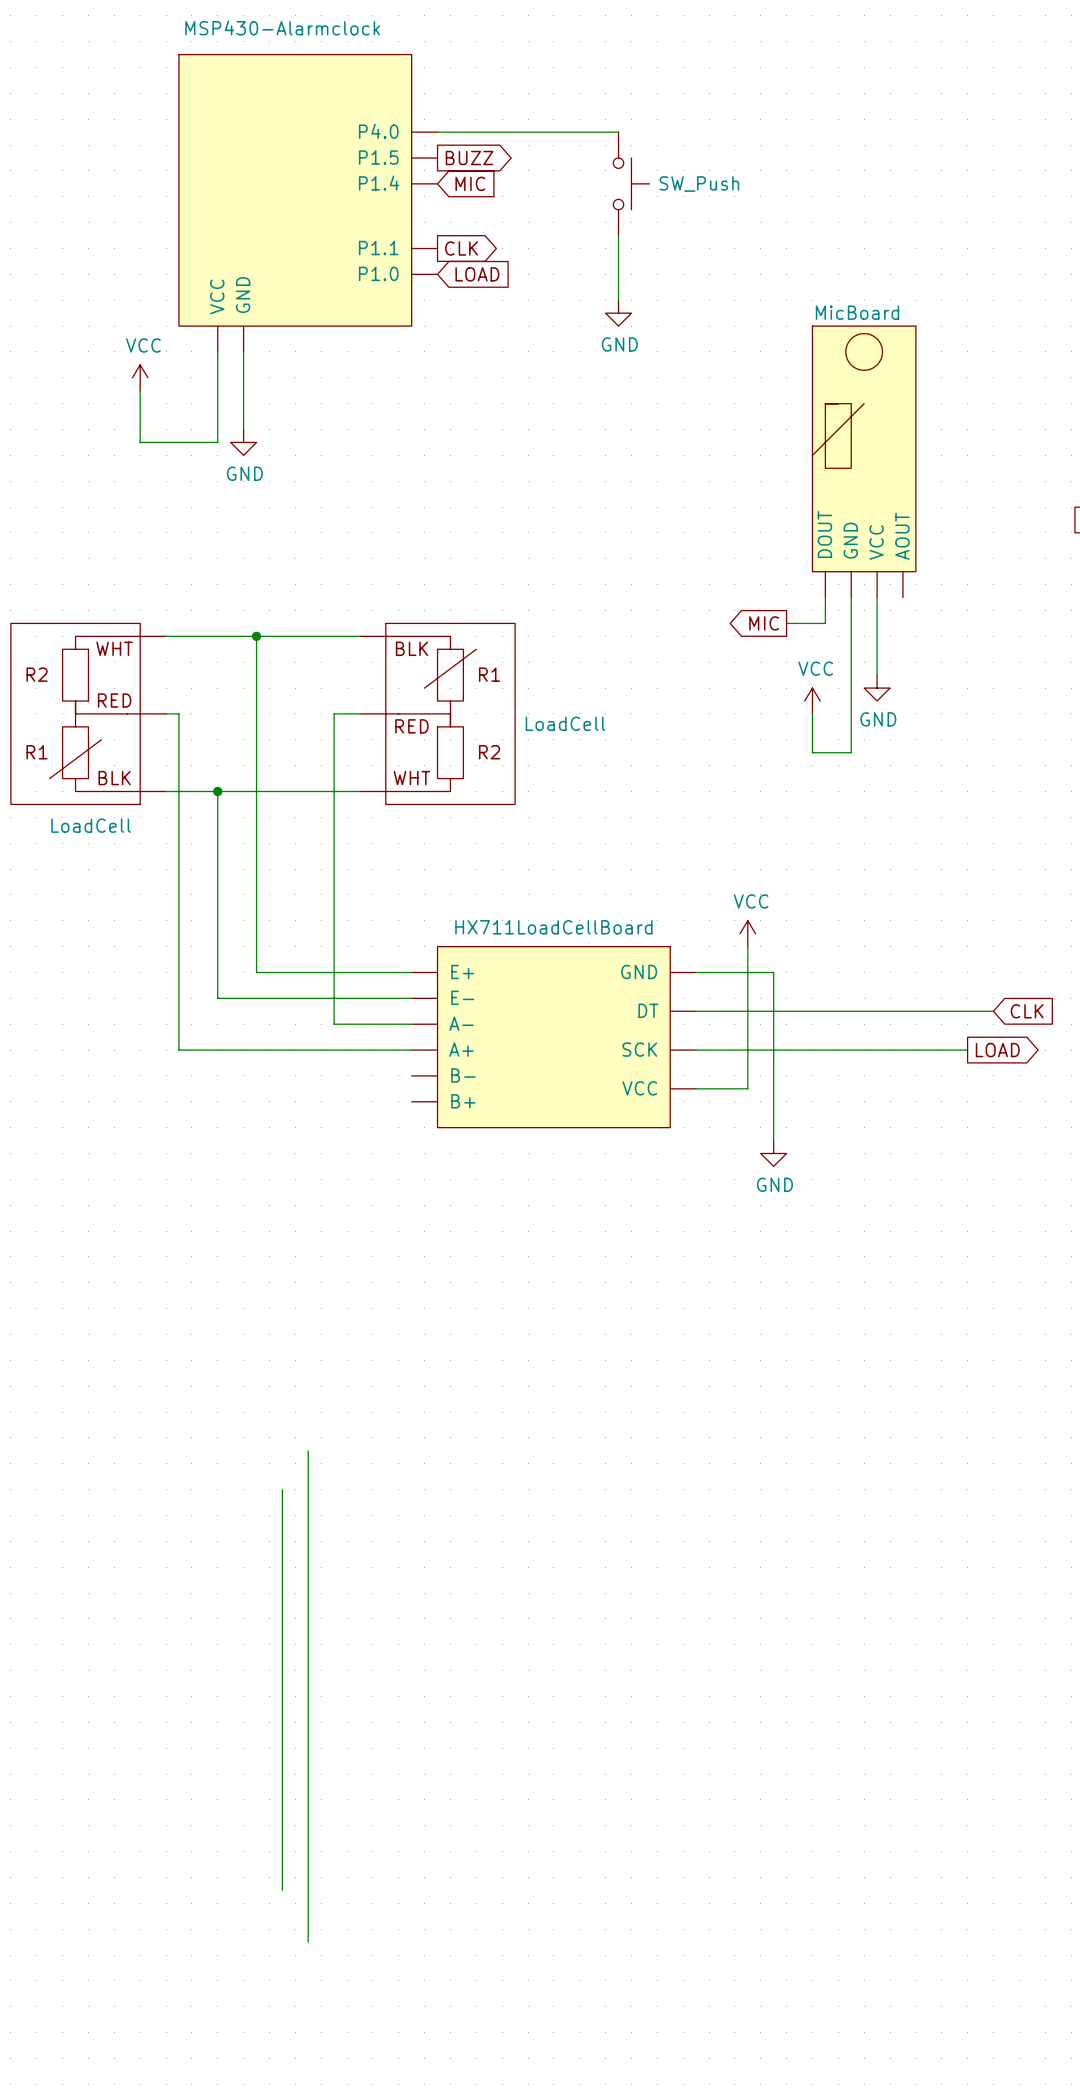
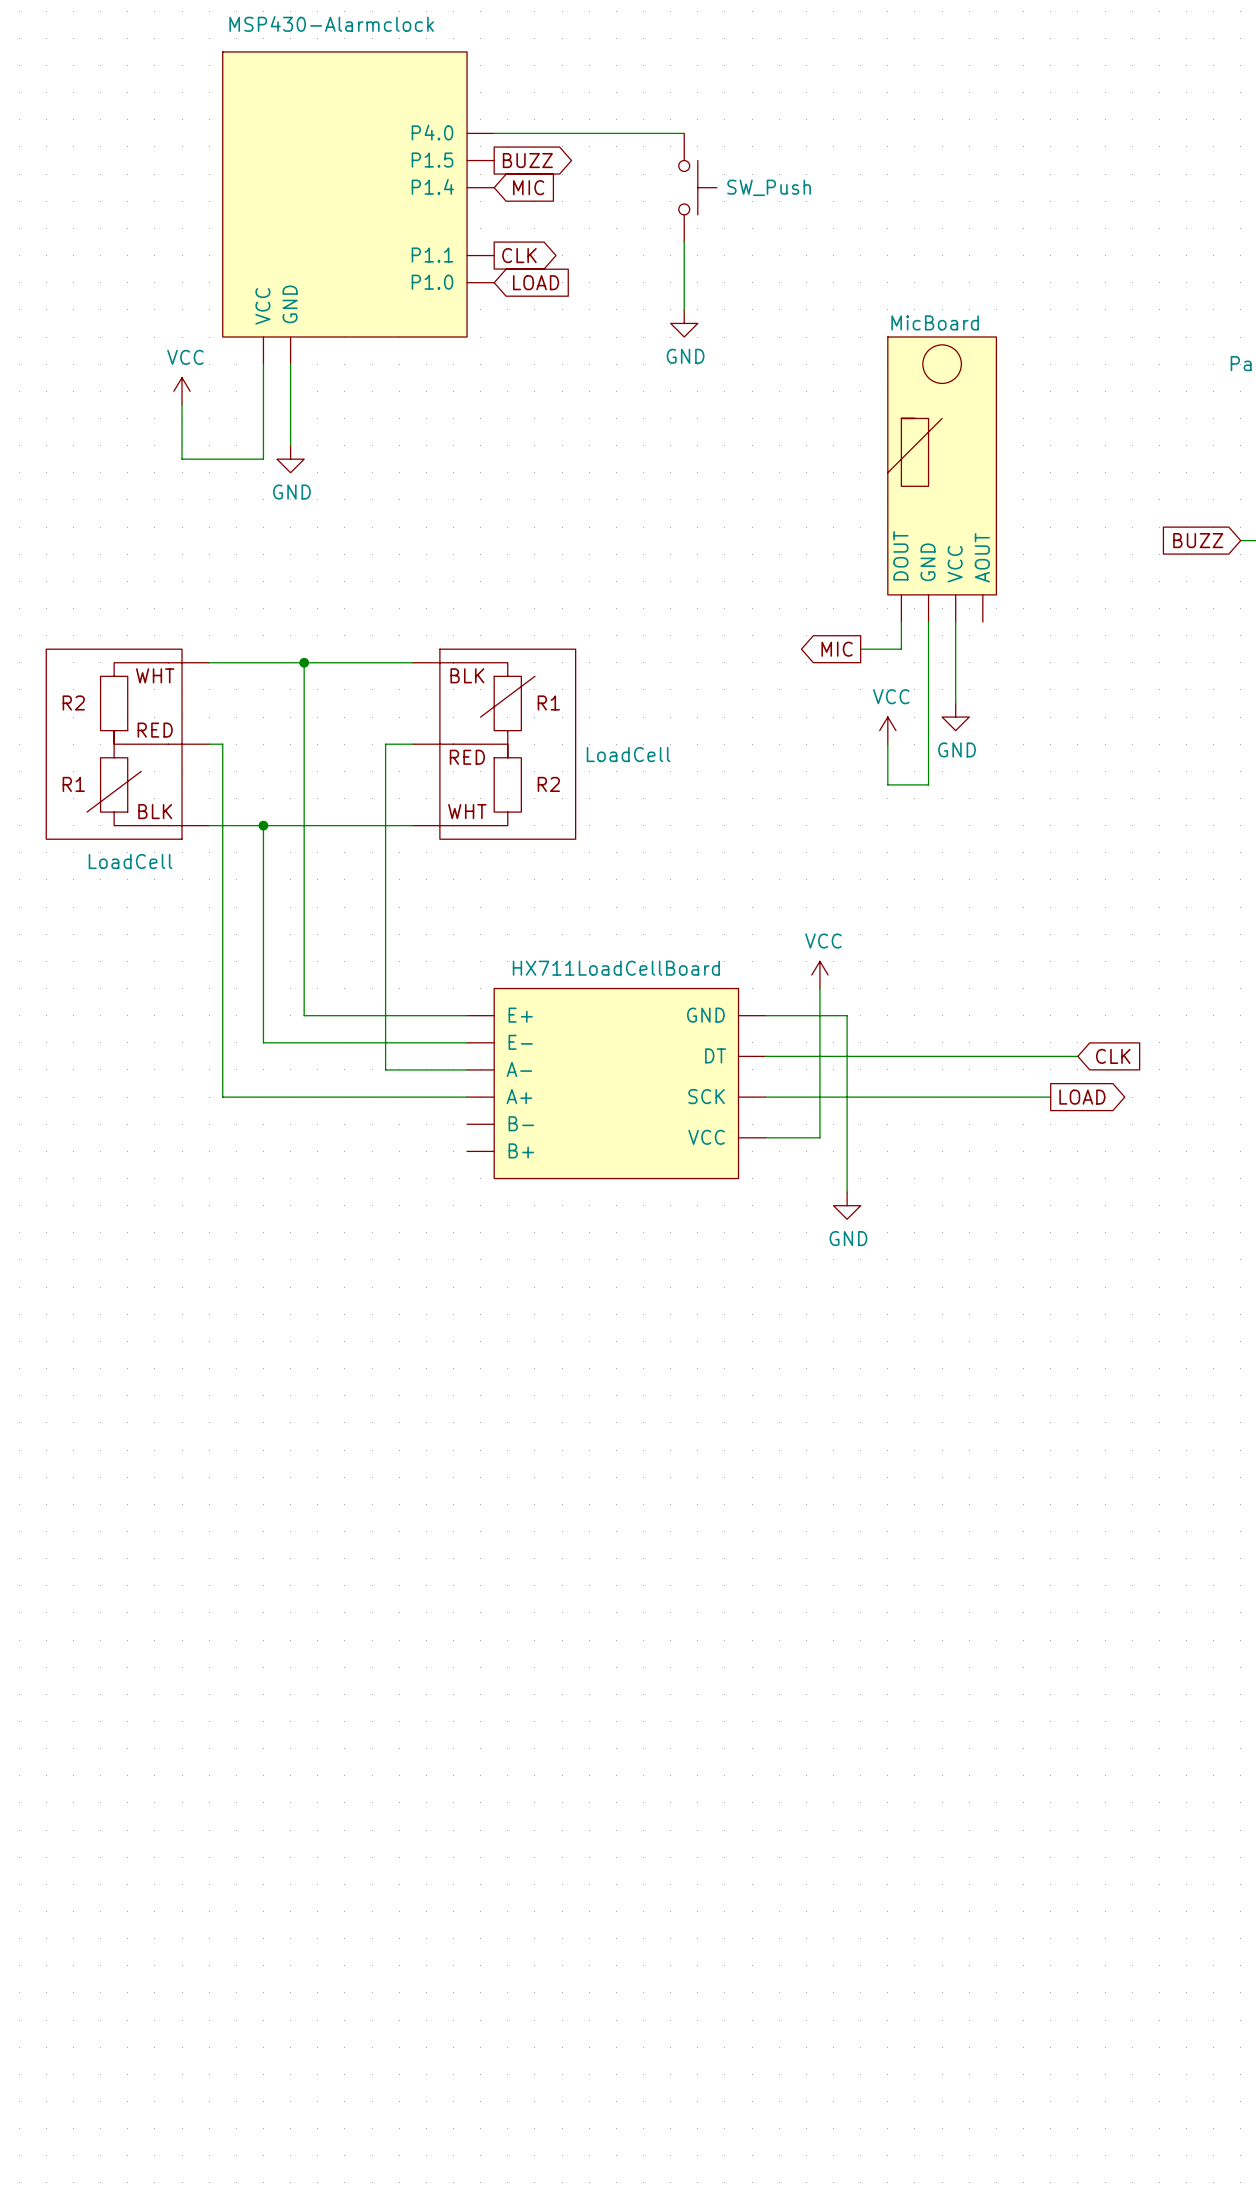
wire: (308, 1450) (308, 1942) -> none
wire: (282, 1489) (282, 1890) -> none

